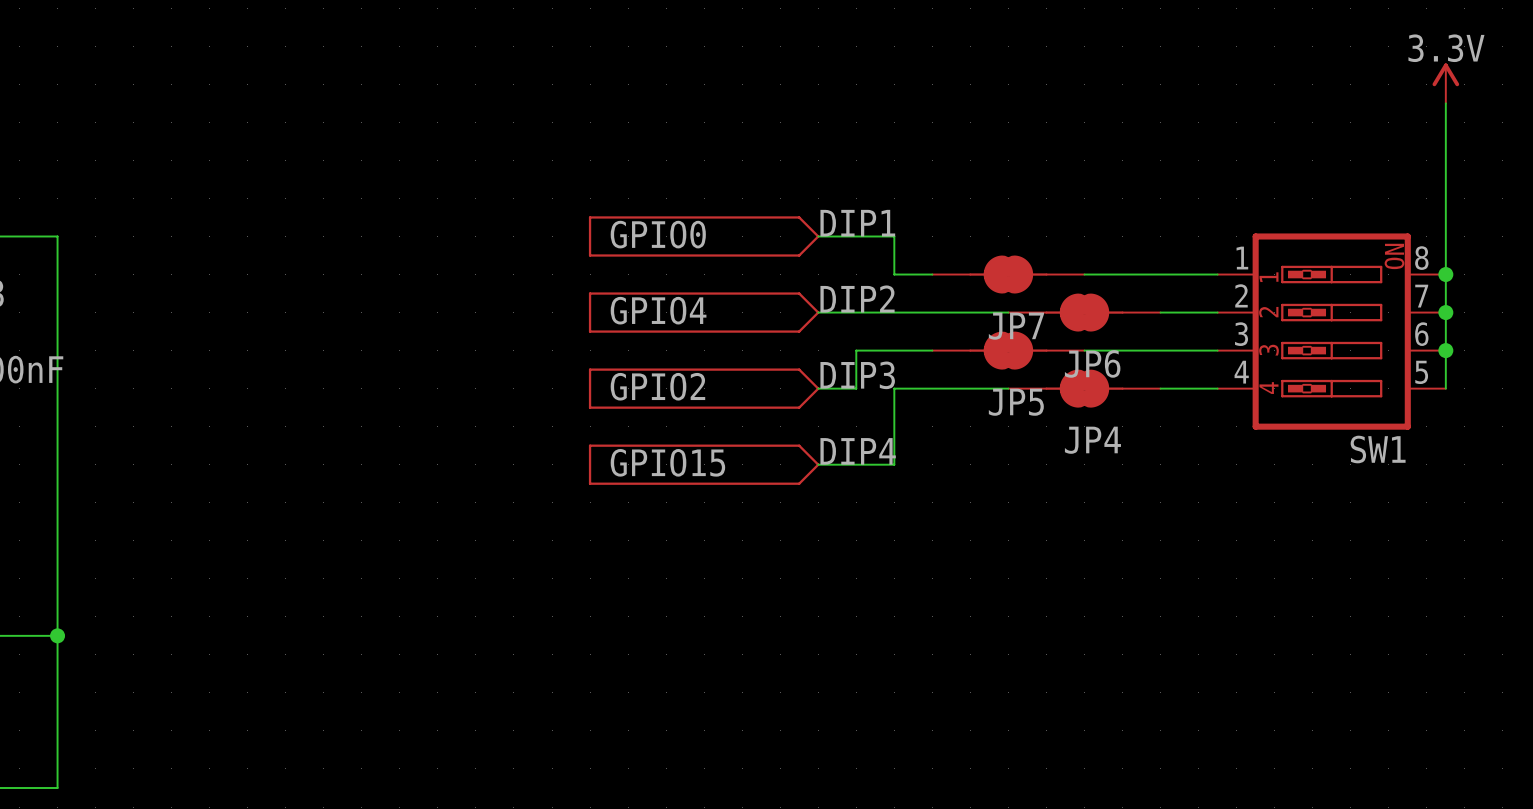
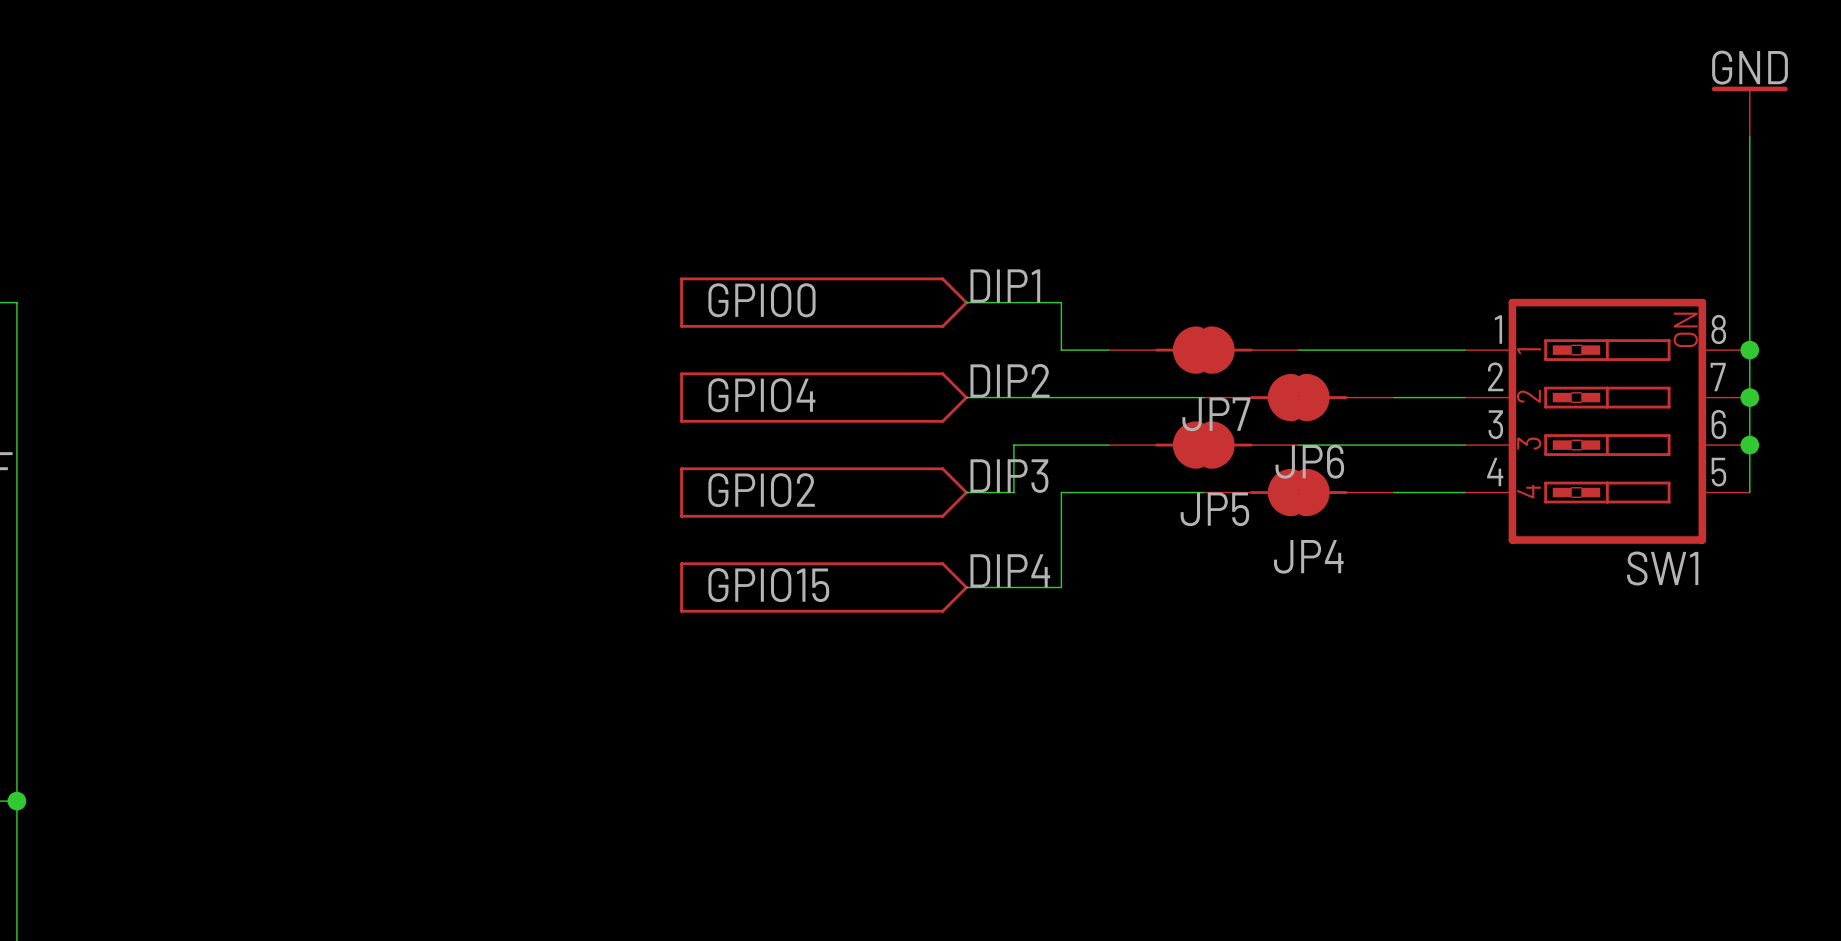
power symbol: 3.3V (1445, 83) -> GND (1749, 111)

